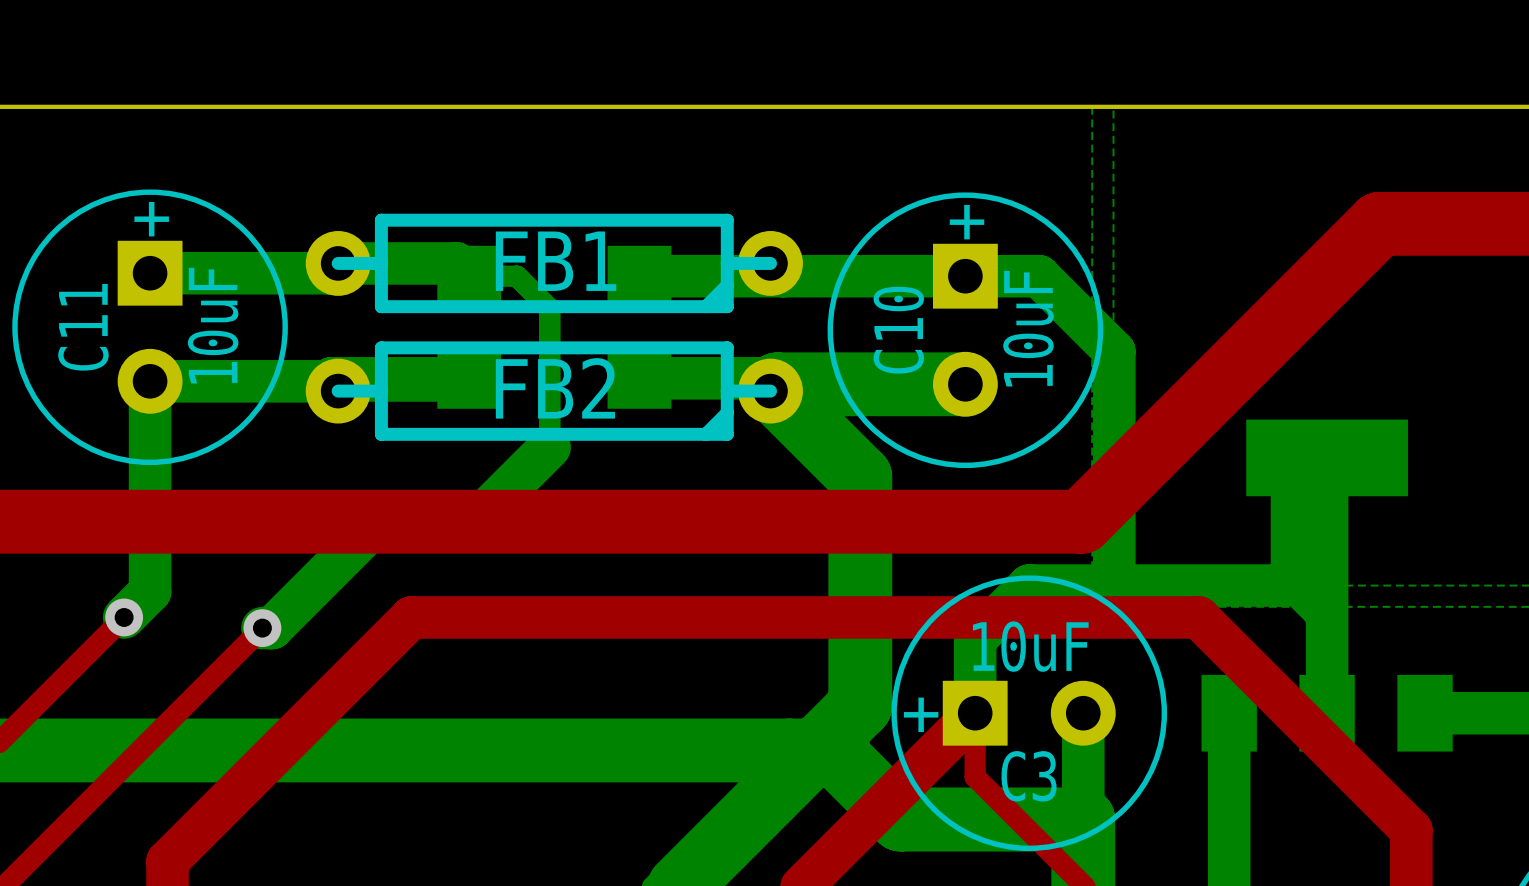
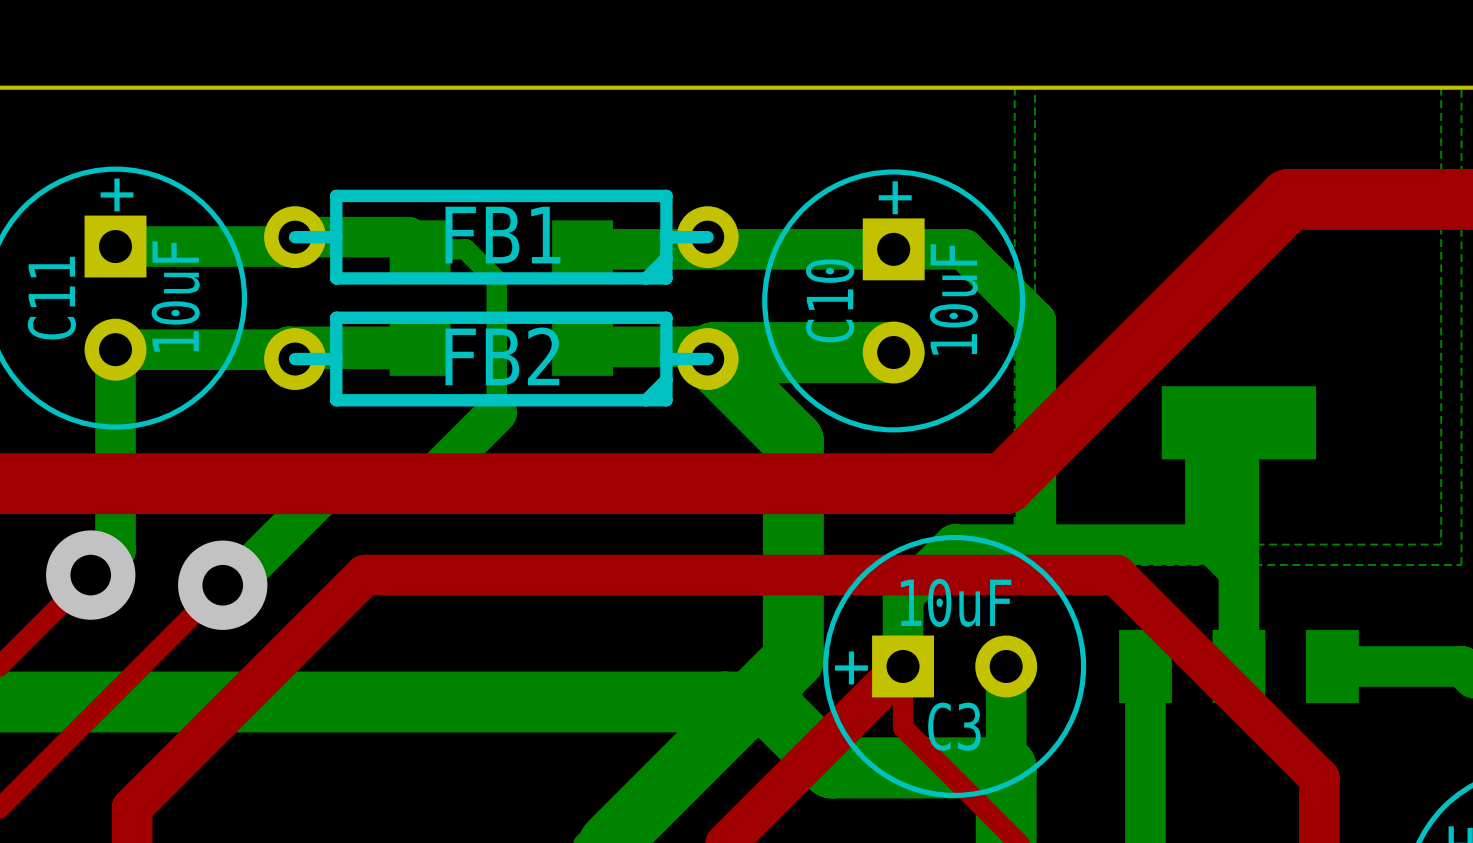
via size: [105, 598, 144, 637] -> [46, 530, 136, 620]
via size: [243, 609, 282, 648] -> [178, 540, 268, 630]

